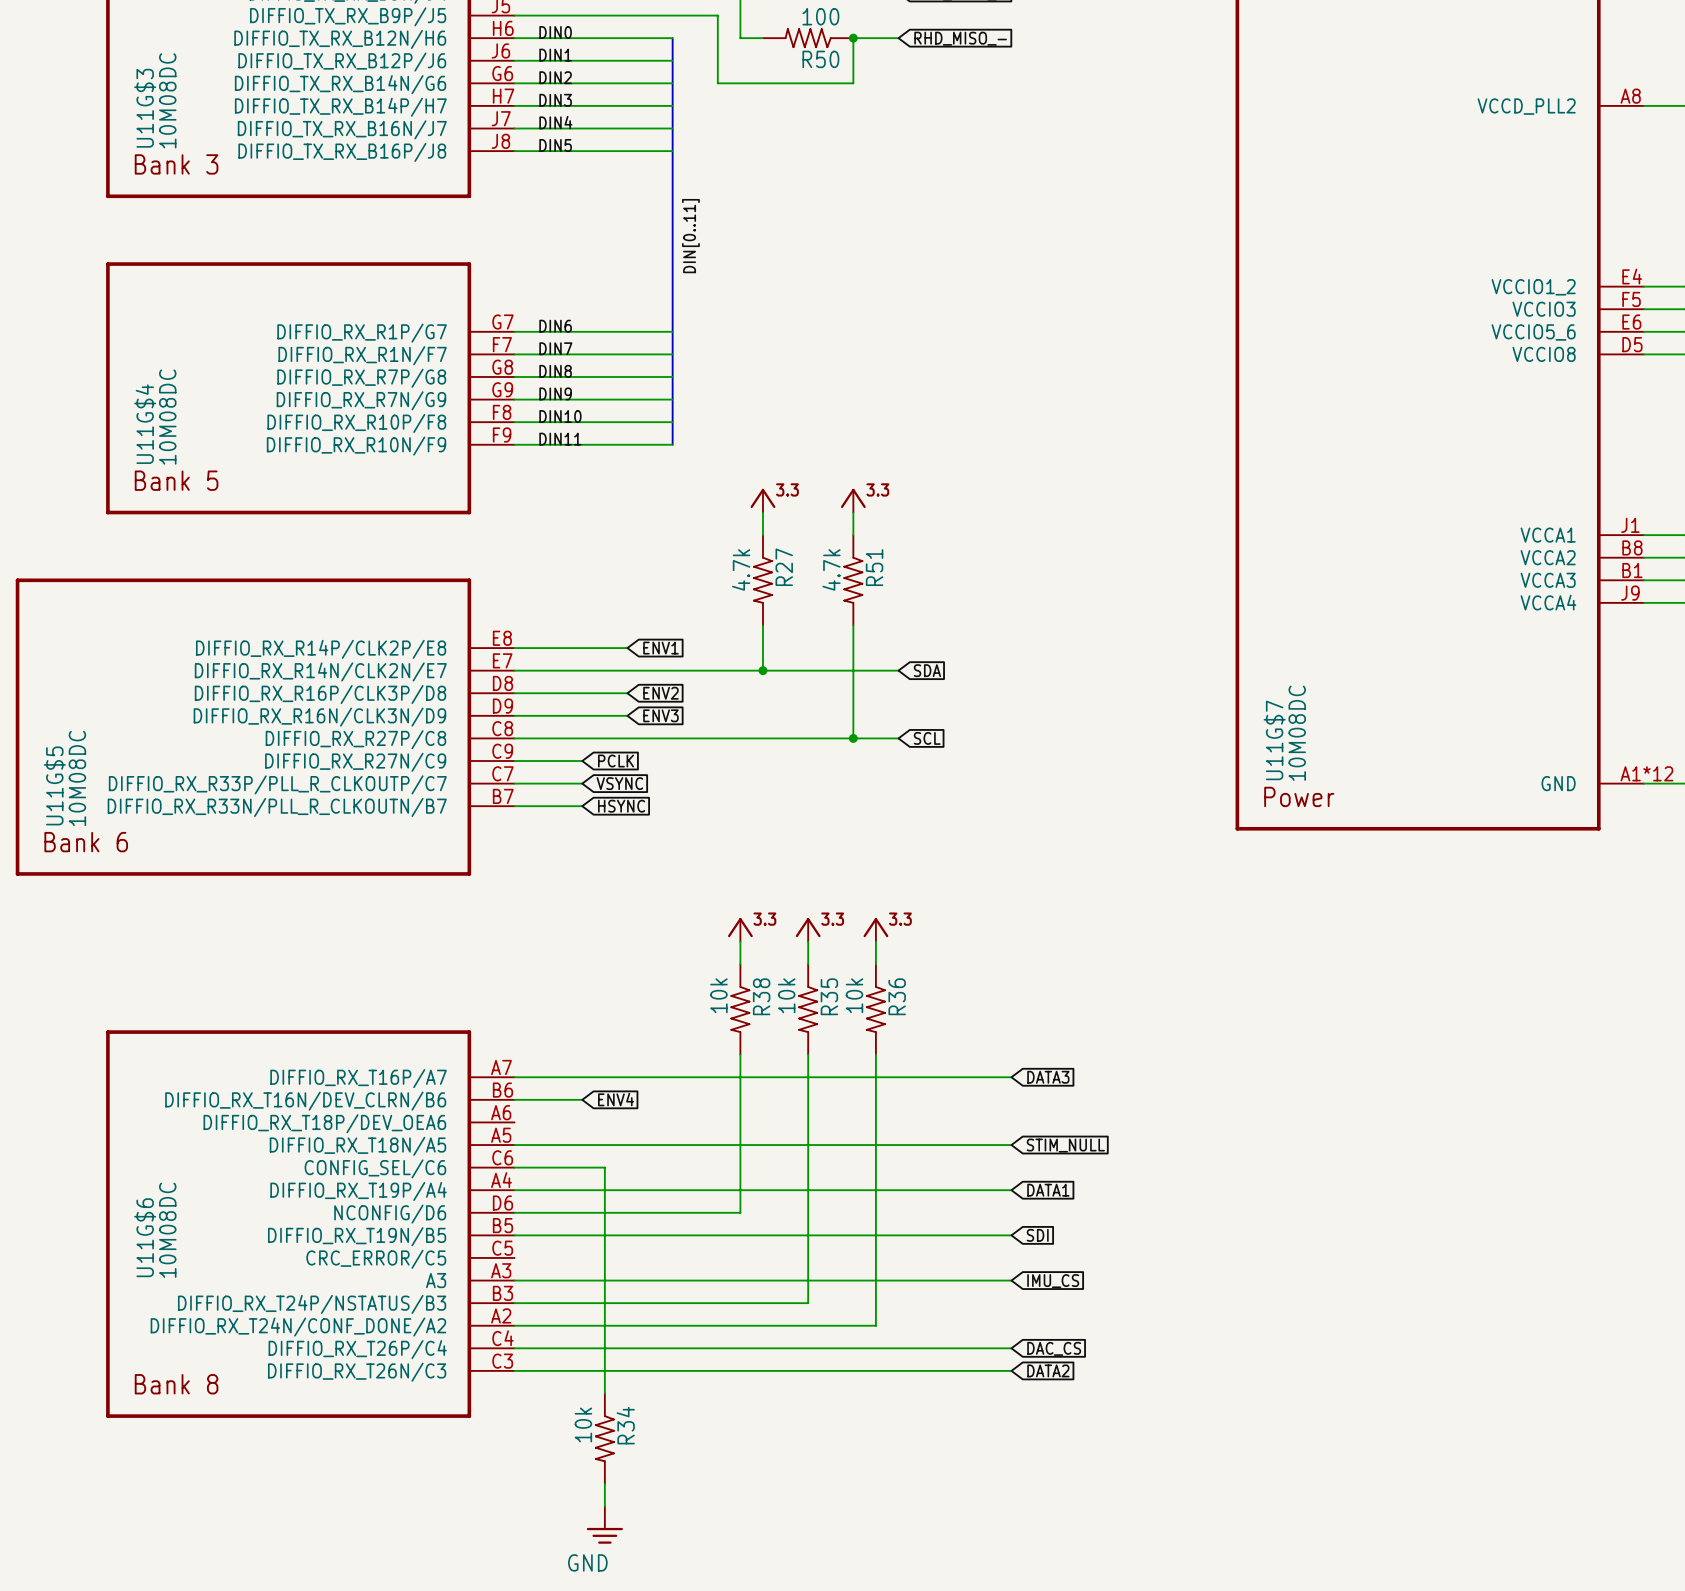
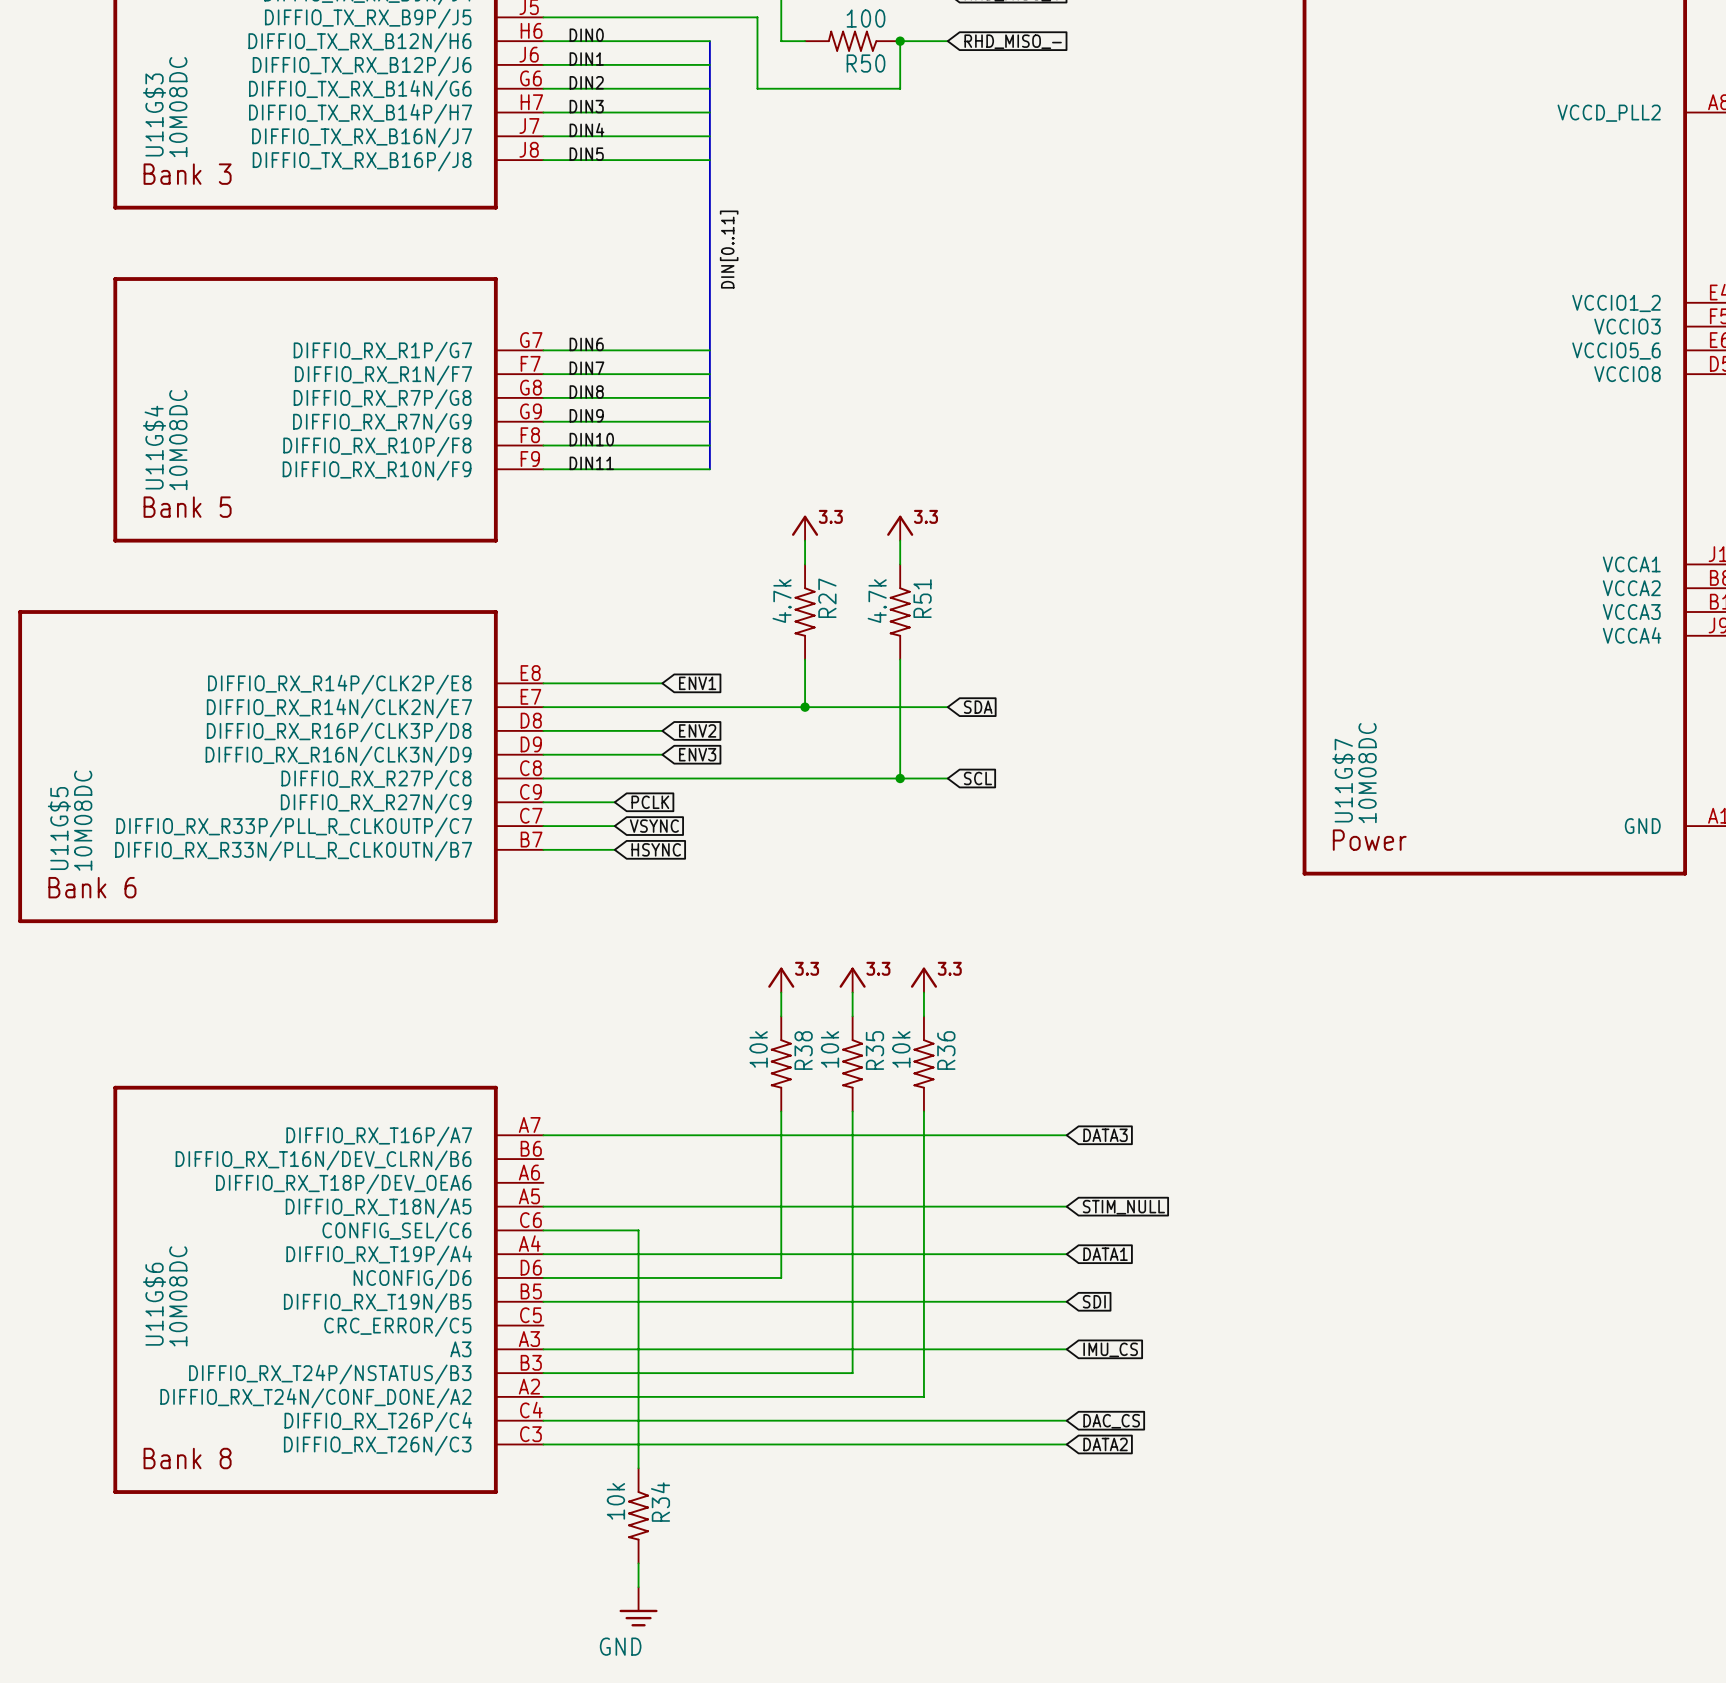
wire: (514, 1099) (582, 1099) -> none
global label: ENV4 (616, 1099) -> none

